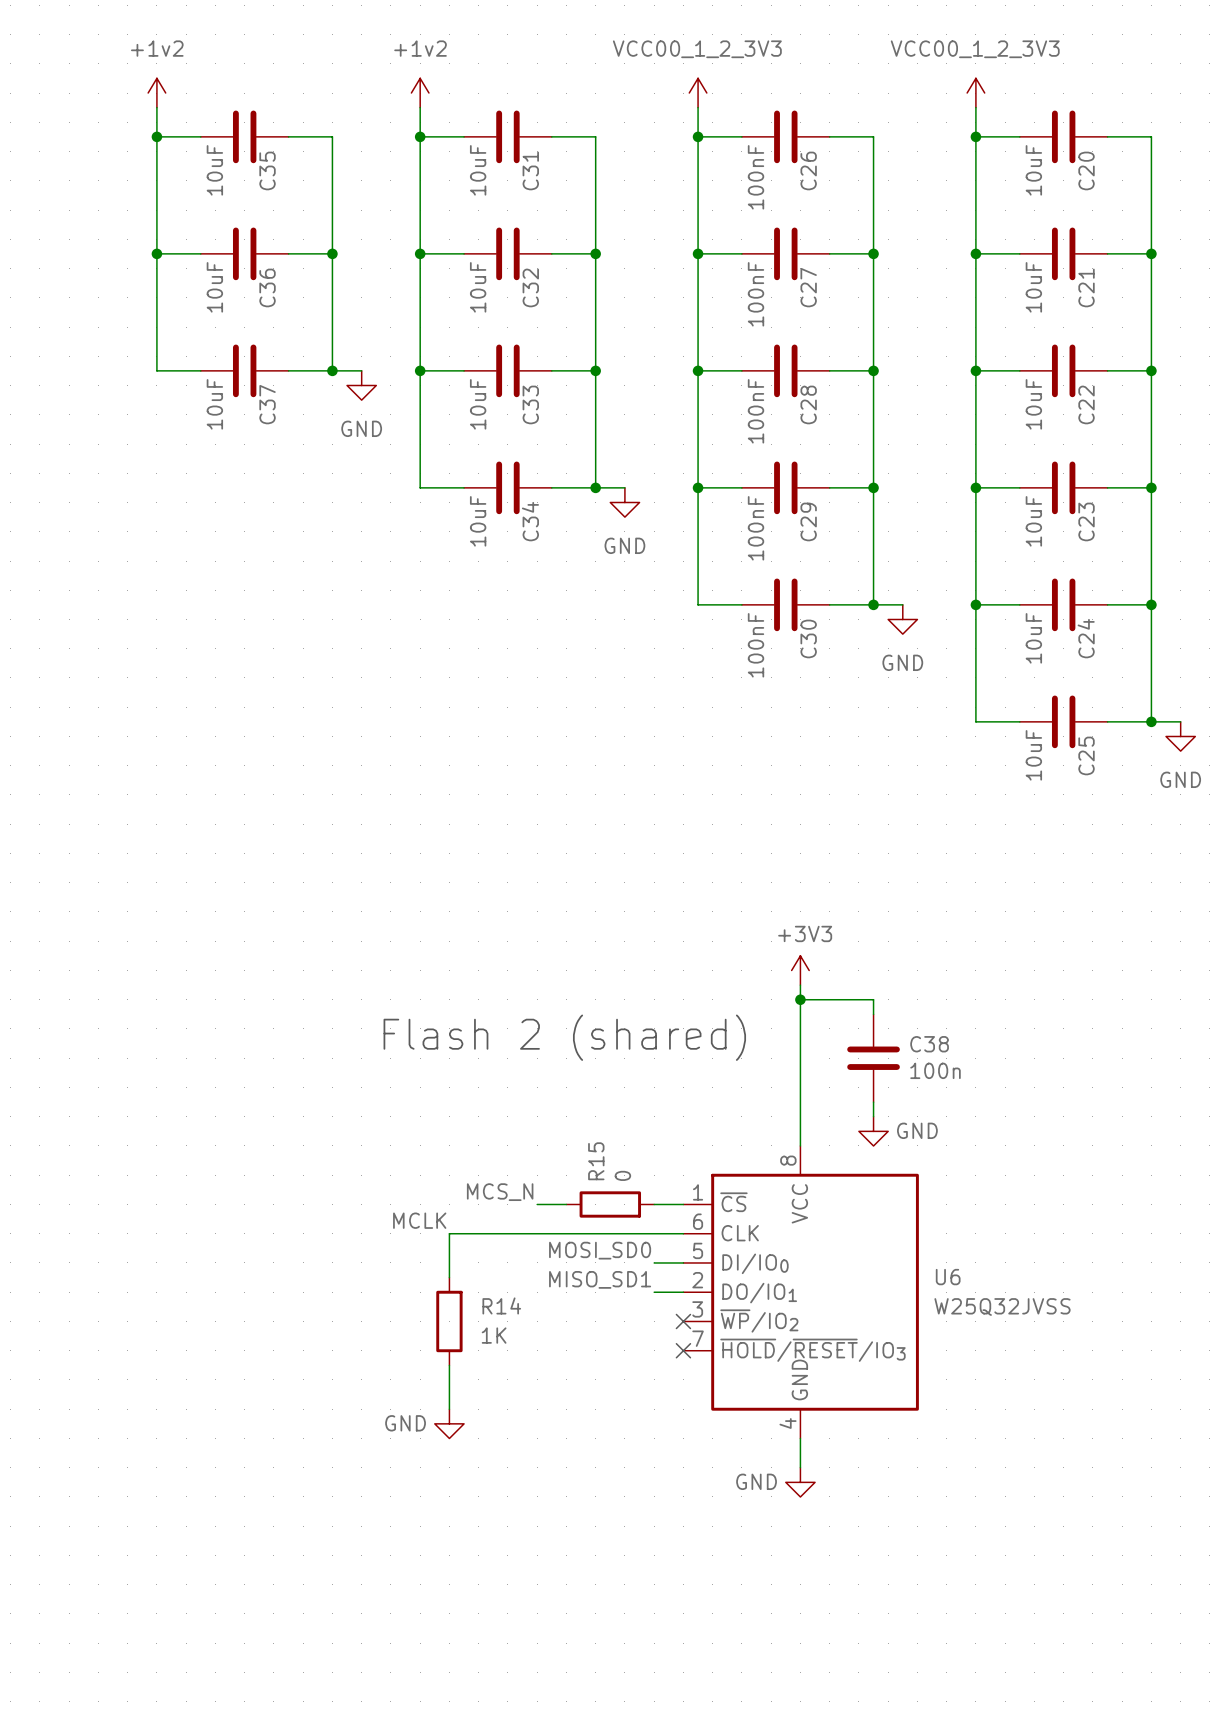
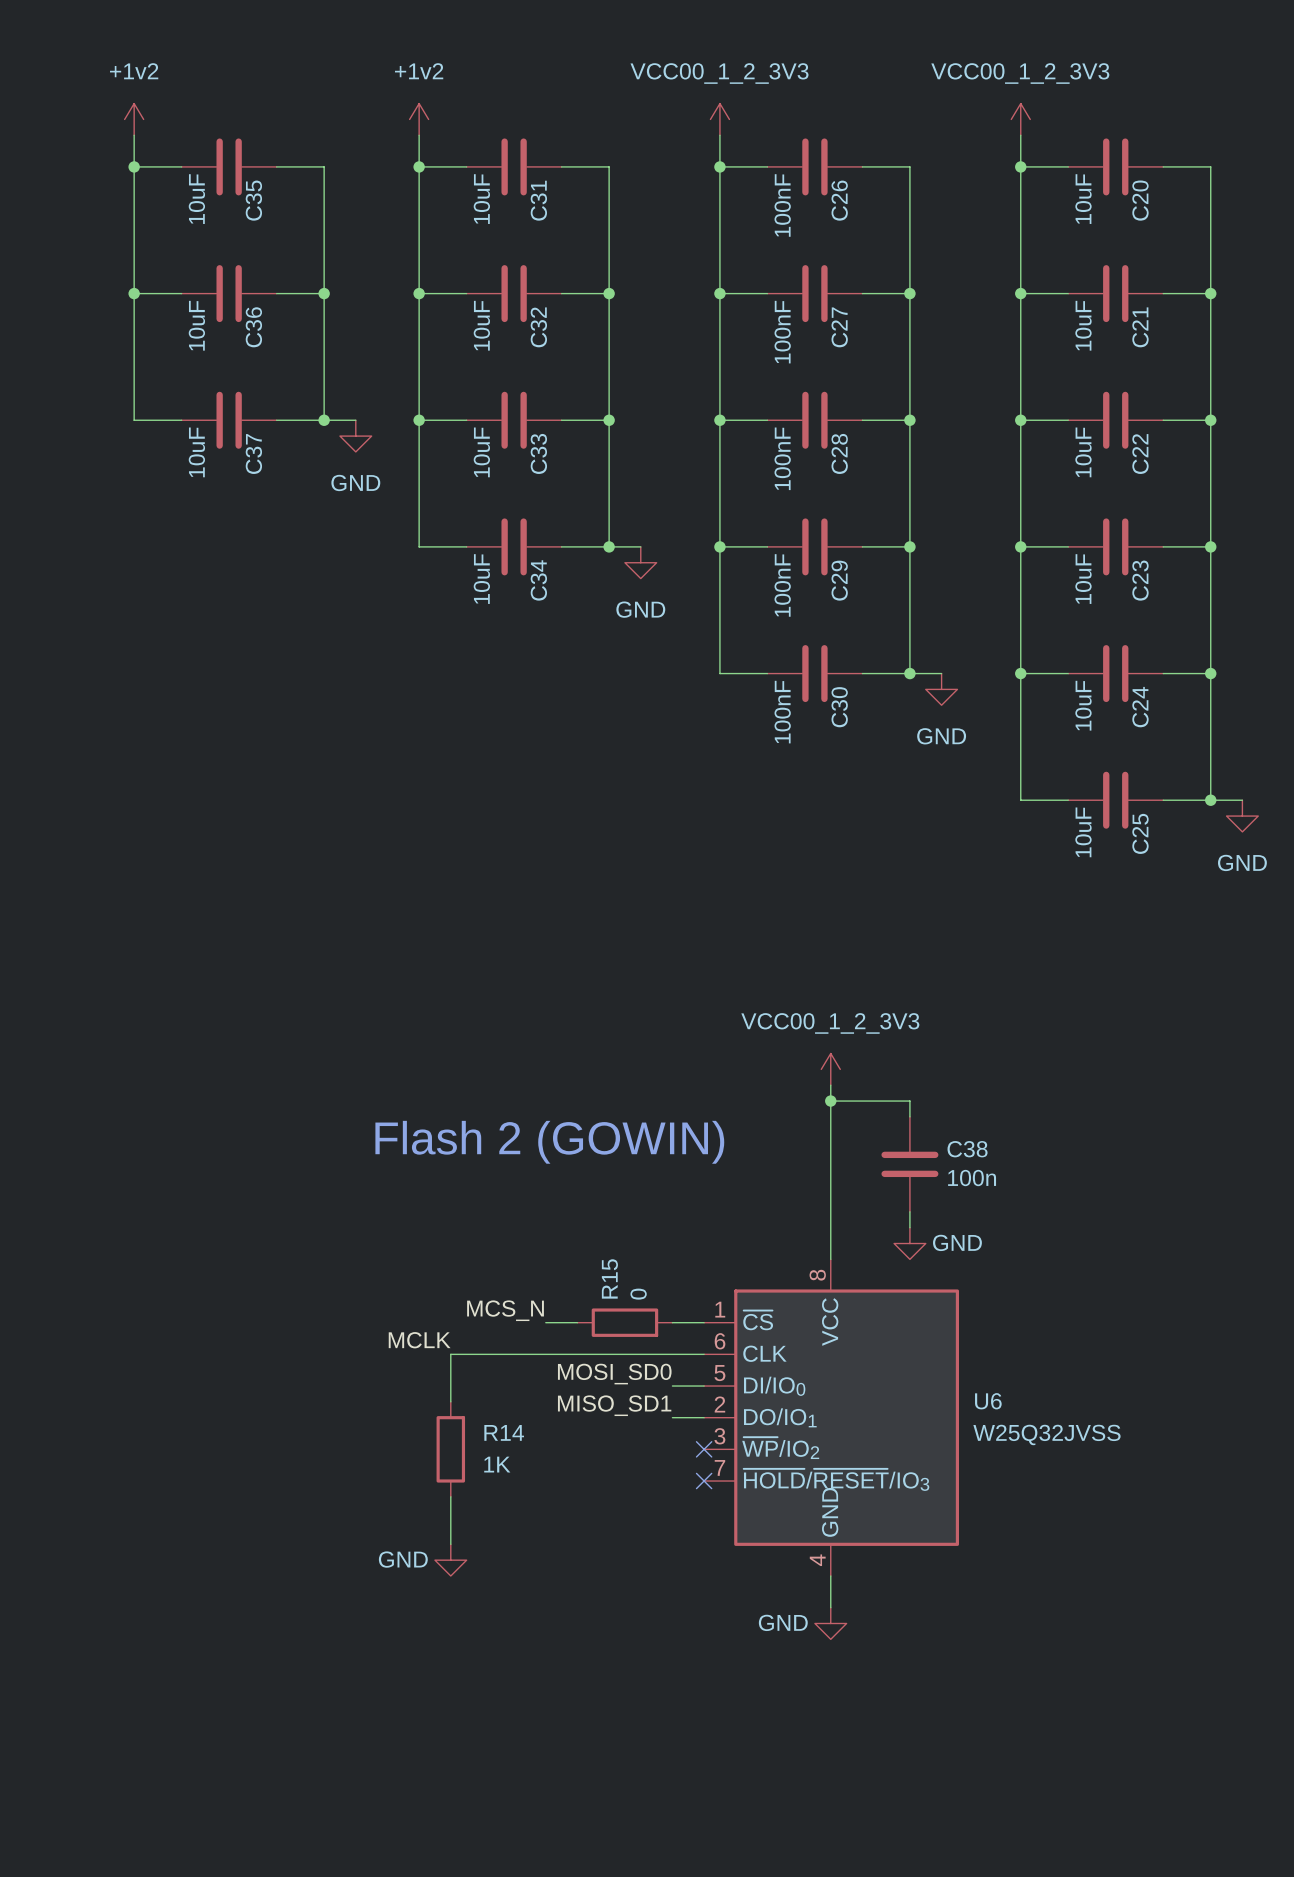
power symbol: +3V3 (800, 970) -> VCC00_1_2_3V3 (830, 1069)
text: Flash 2 (shared) (564, 1037) -> Flash 2 (GOWIN) (549, 1142)

